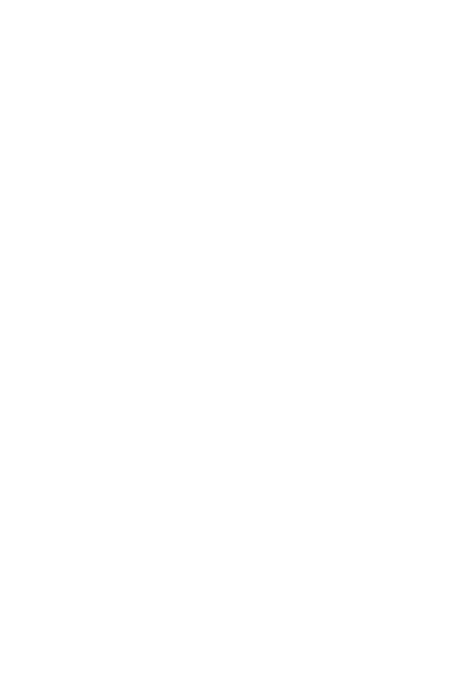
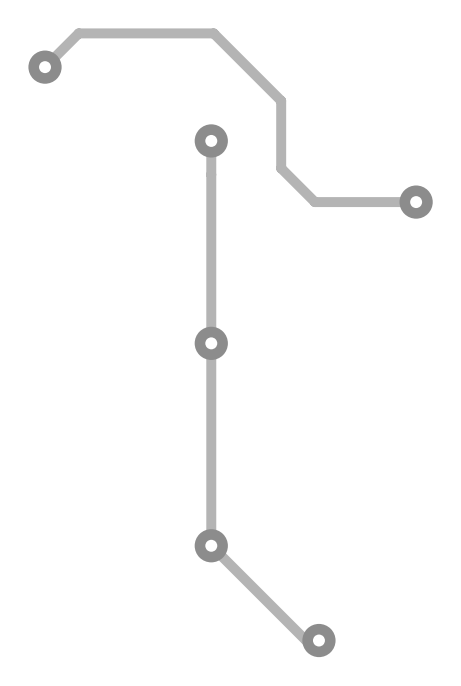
track: none -> (45, 67) (78, 33) (213, 33) (281, 100) (281, 168) (314, 202) (416, 202)
via: none -> (45, 67)
track: none -> (211, 140) (211, 545) (306, 640) (318, 640)
via: none -> (211, 140)
via: none -> (416, 202)
via: none -> (211, 343)
via: none -> (211, 545)
via: none -> (318, 640)

